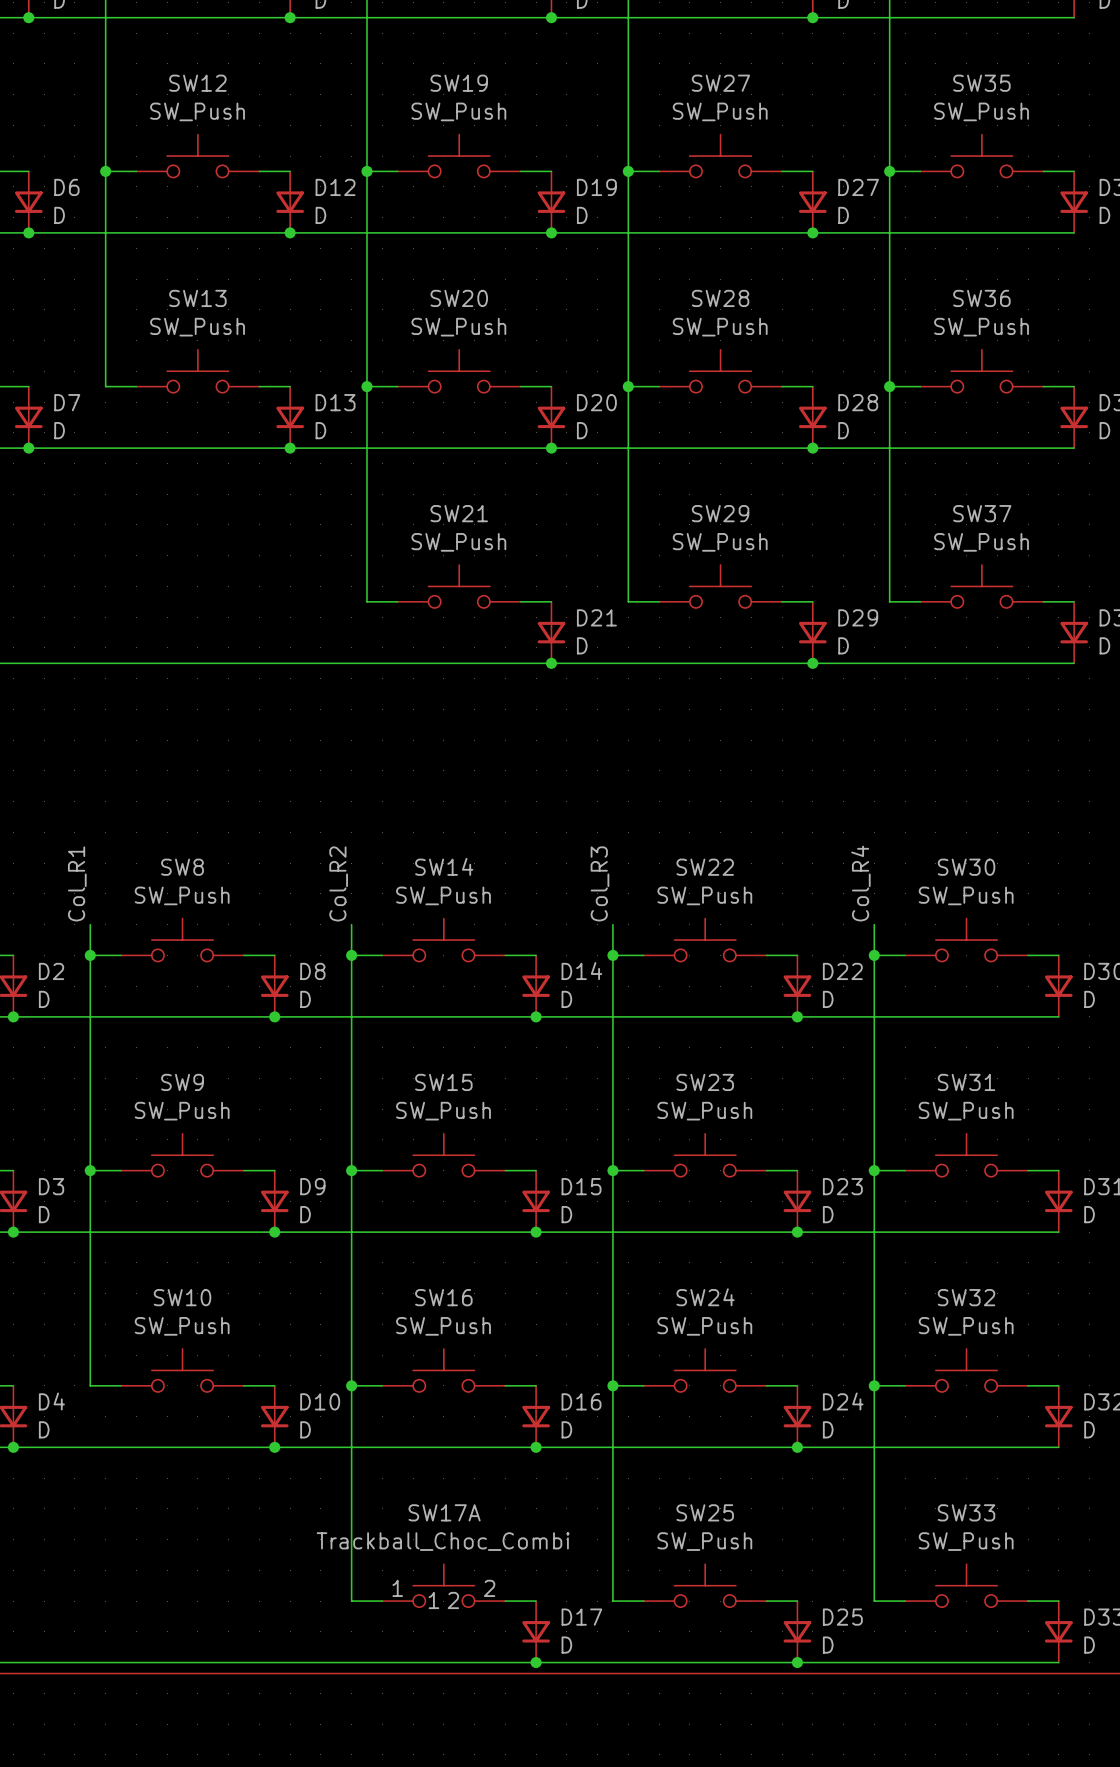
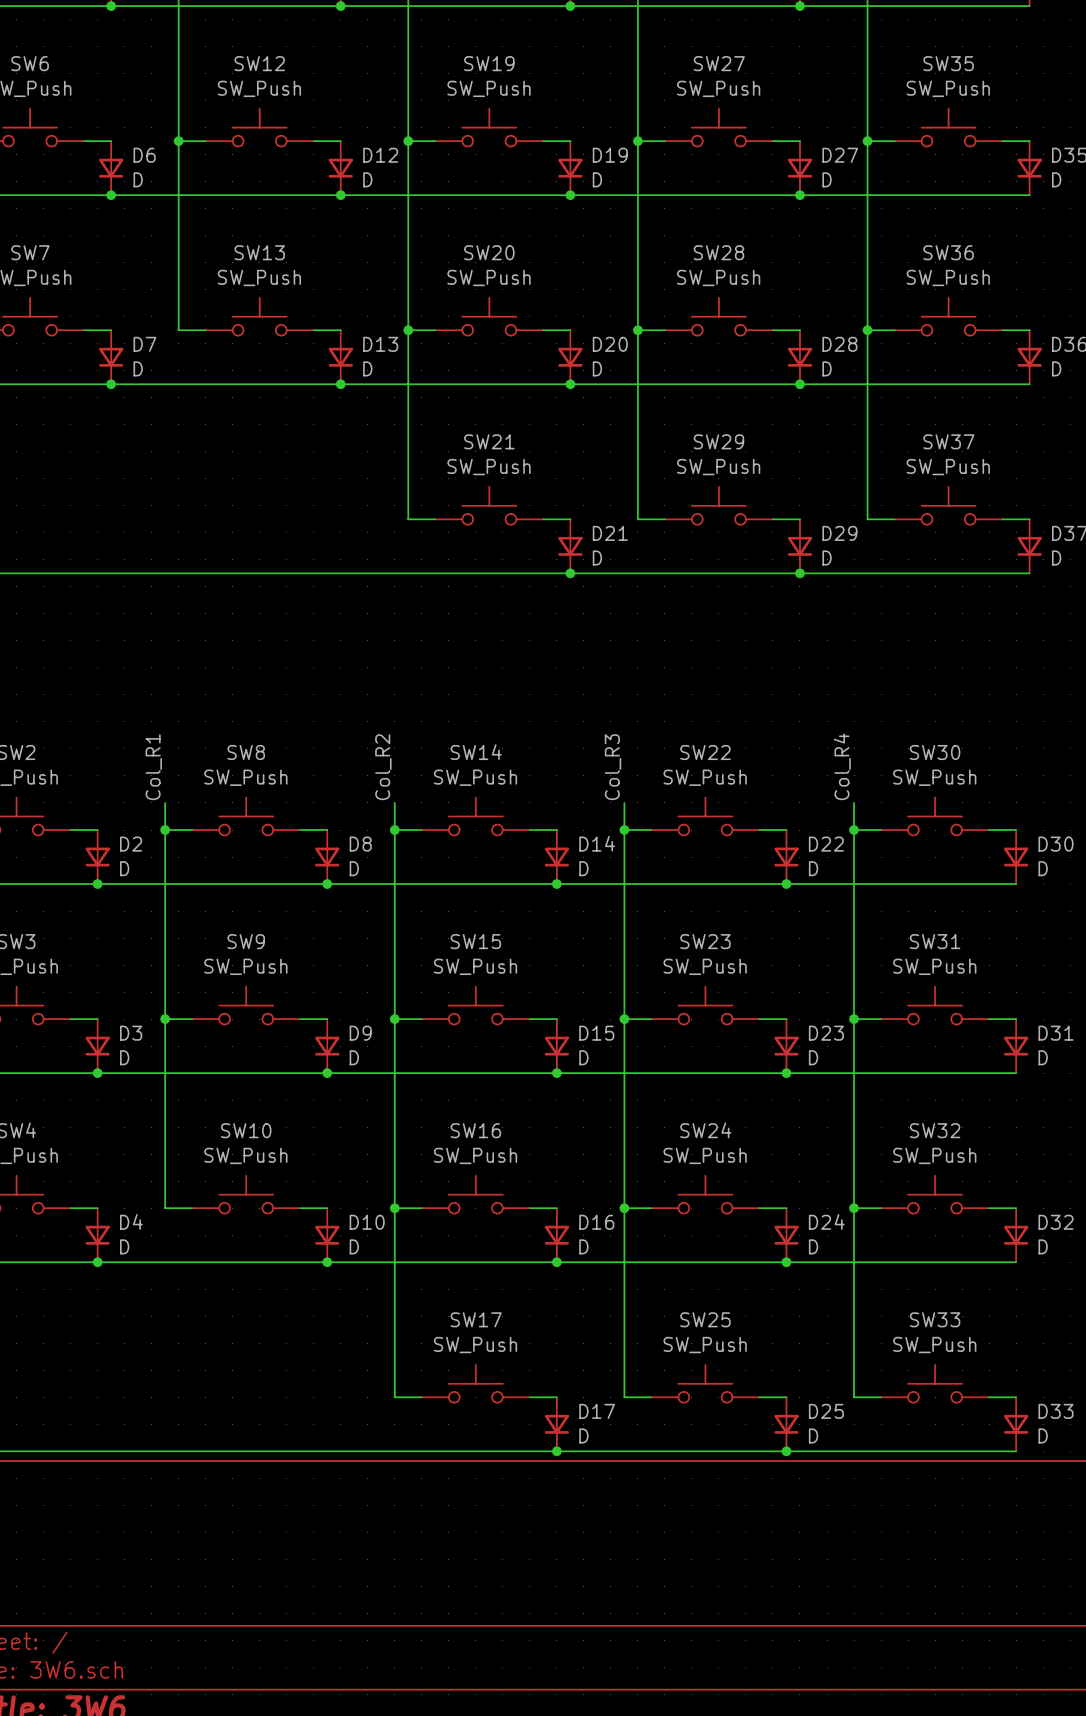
SW17A name: SW17A (444, 1512) -> SW17 (476, 1319)
SW17A value: Trackball_Choc_Combi (443, 1541) -> SW_Push (475, 1345)
SW17A pin number: 1 (397, 1588) -> none
SW17A pin number: 2 (489, 1588) -> none
SW17A pin name: 1 (433, 1600) -> none
SW17A pin name: 2 (453, 1600) -> none

